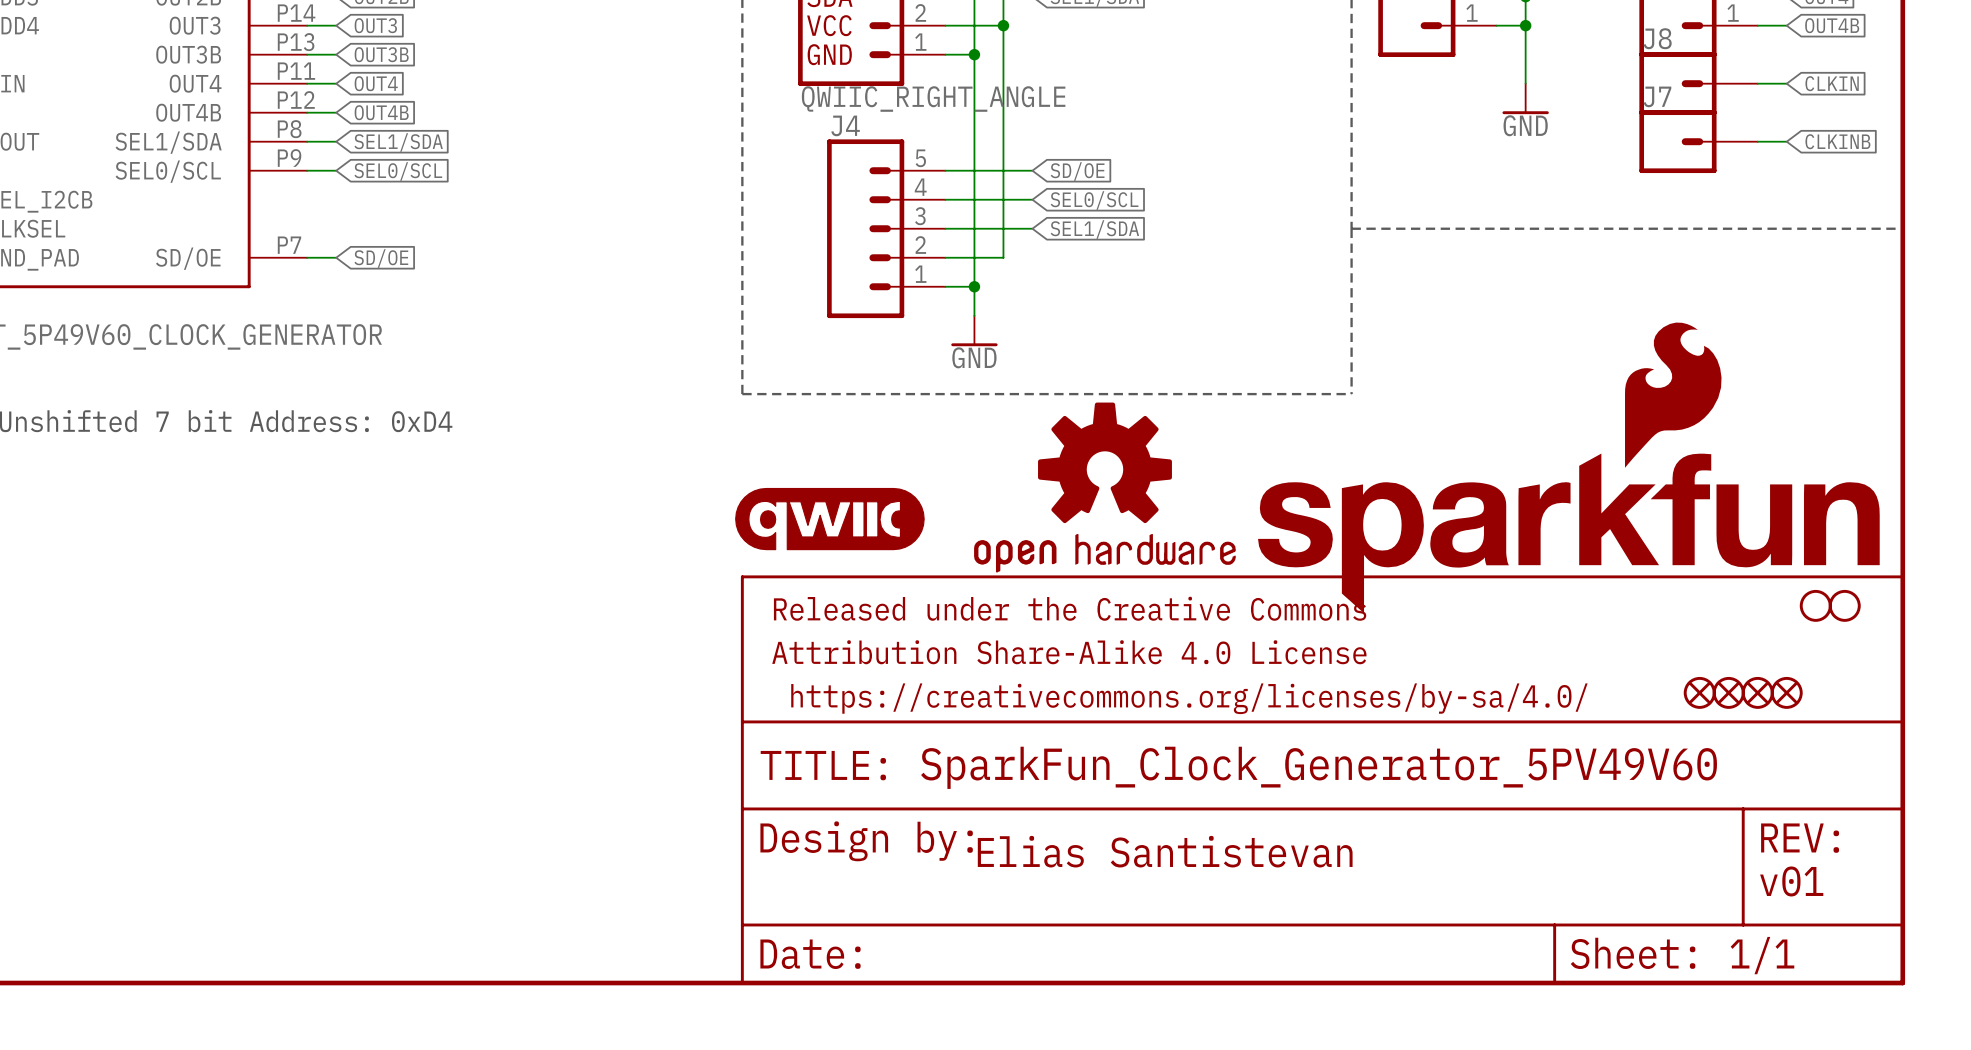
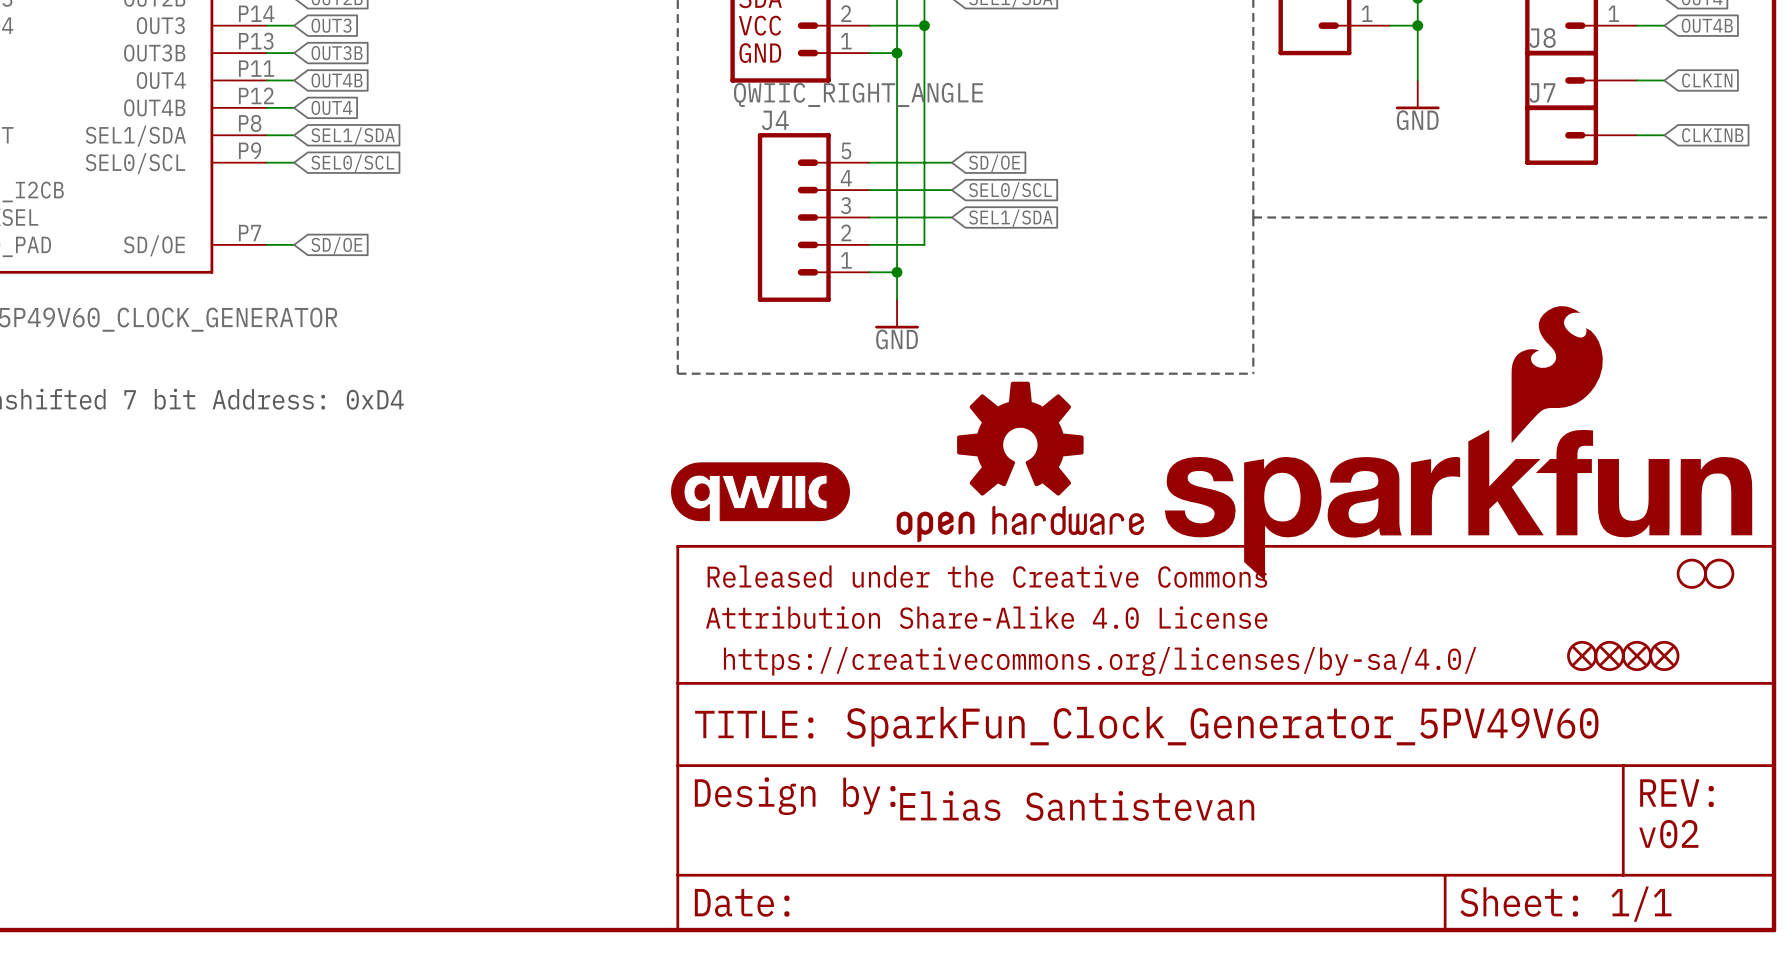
global label: OUT4 (376, 83) -> OUT4B (337, 80)
global label: OUT4B (381, 112) -> OUT4 (331, 107)
text: v01 (1791, 881) -> v02 (1668, 834)

